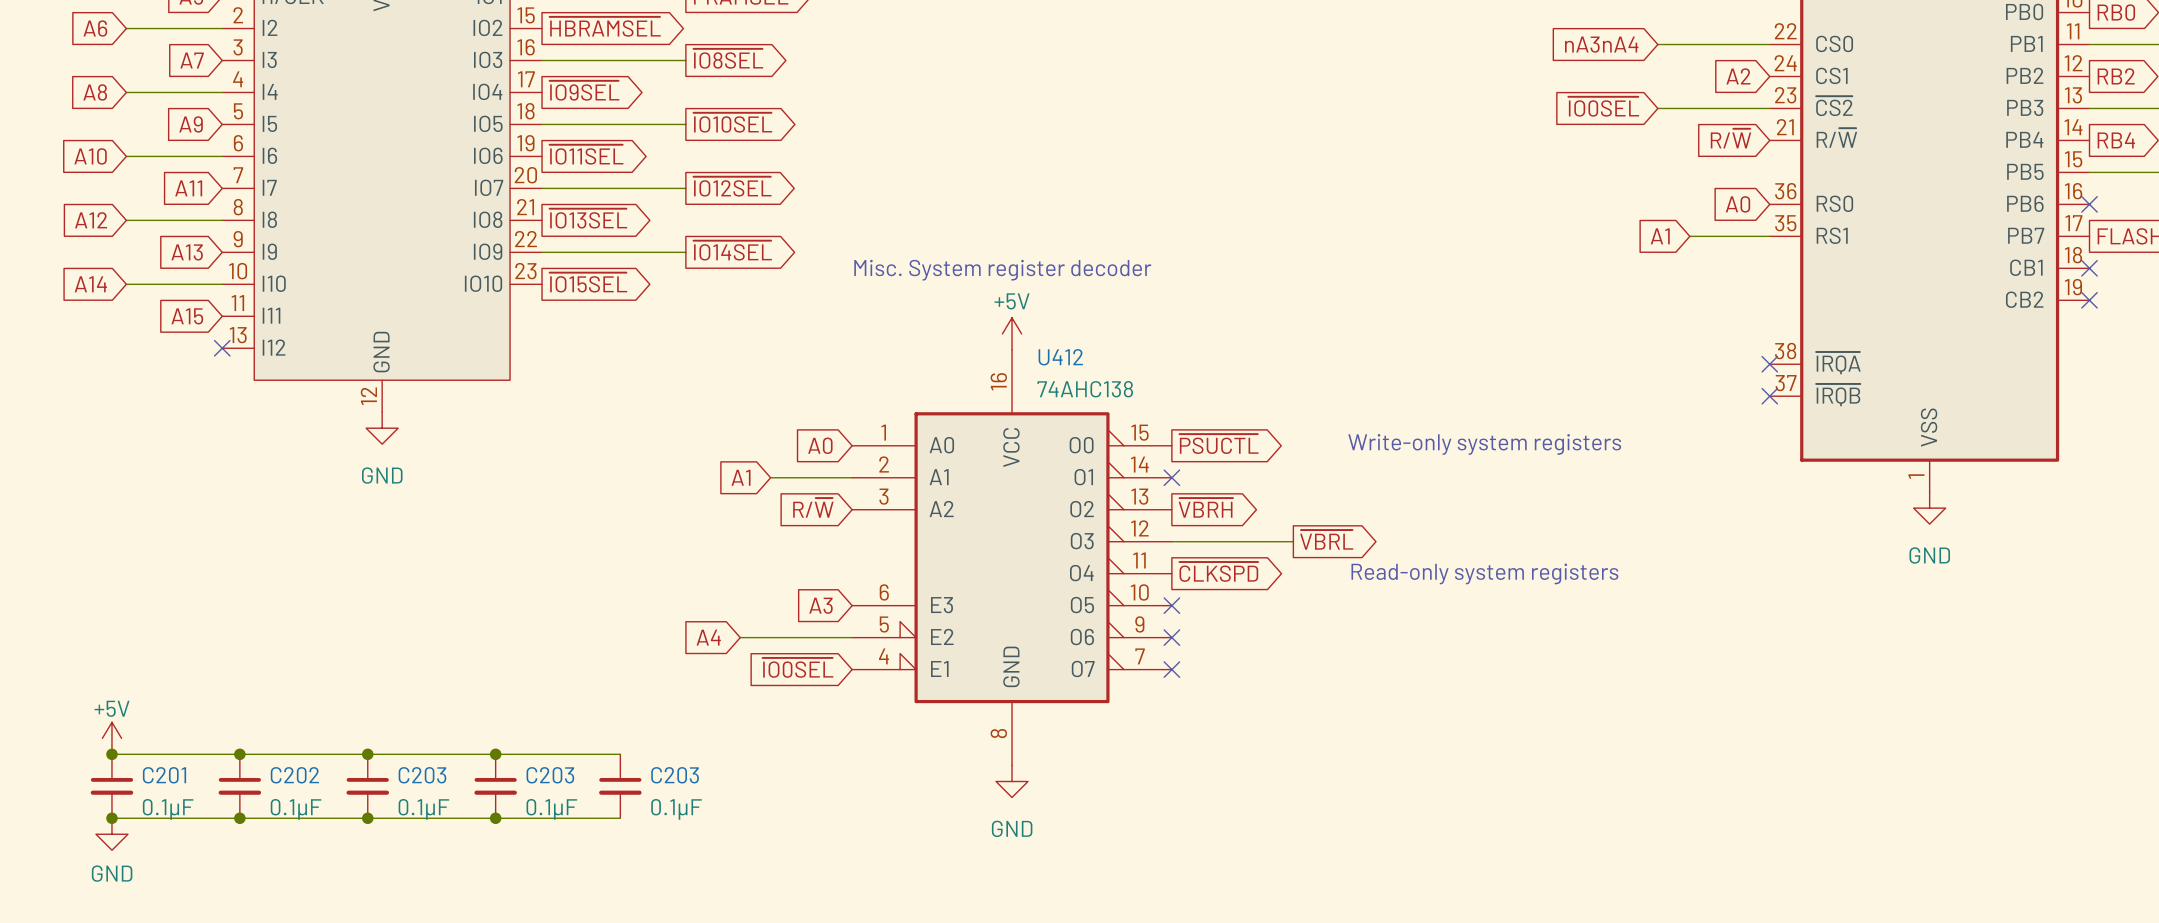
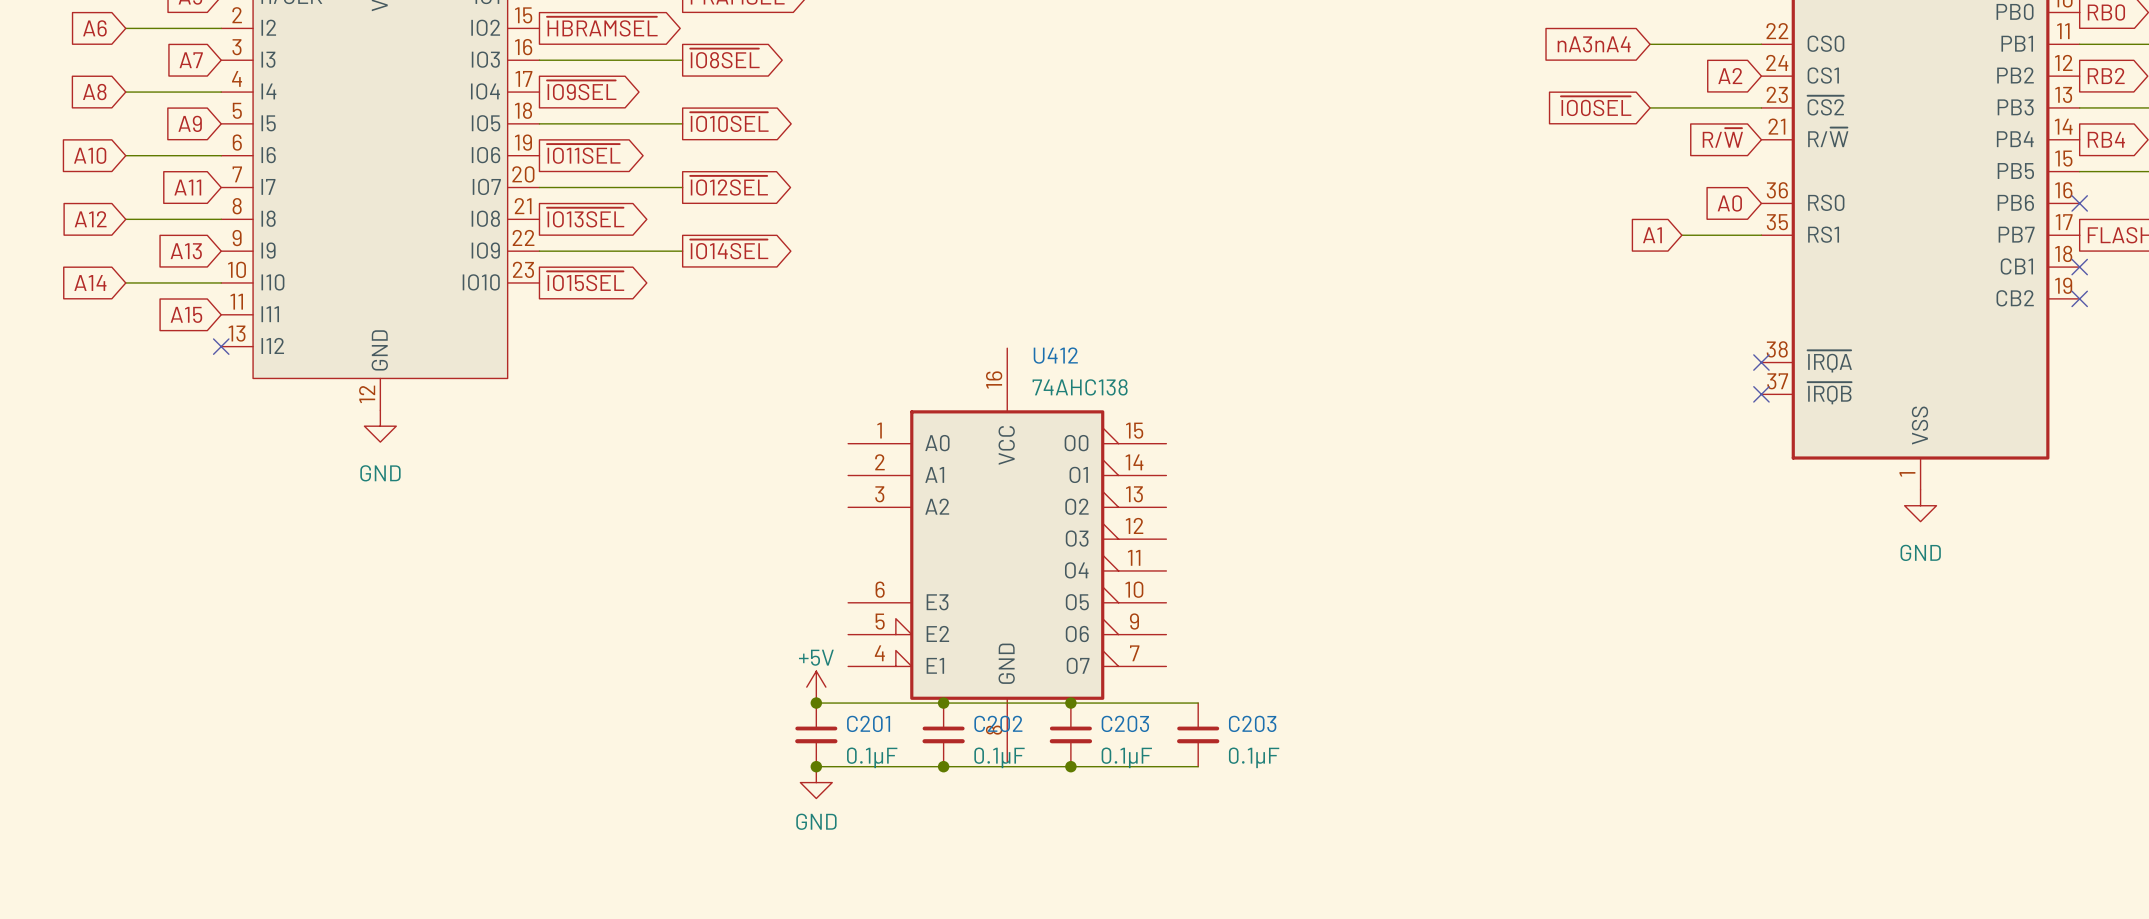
text: Misc. System register decoder (1002, 270) -> none
power symbol: +5V (1012, 333) -> none
global label: ~{PSUCTL} (1219, 444) -> none
text: Write-only system registers (1484, 444) -> none
global label: A0 (820, 445) -> none
global label: A1 (741, 477) -> none
wire: (770, 477) (852, 477) -> none
no-connect mark: (1171, 477) -> none
global label: R/~{W} (813, 507) -> none
global label: ~{VBRH} (1205, 507) -> none
global label: ~{VBRL} (1326, 539) -> none
wire: (1171, 541) (1293, 541) -> none
global label: ~{CLKSPD} (1218, 571) -> none
text: Read-only system registers (1484, 573) -> none
global label: A3 (820, 605) -> none
no-connect mark: (1171, 605) -> none
global label: A4 (708, 637) -> none
wire: (740, 637) (852, 637) -> none
no-connect mark: (1171, 637) -> none
global label: ~{IO0SEL} (797, 667) -> none
no-connect mark: (1171, 669) -> none
power symbol: none -> +5V (816, 687)
wire: none -> (816, 703) (1198, 703)
junction: none -> (816, 703)
junction: none -> (943, 703)
junction: none -> (1070, 703)
power symbol: +5V (111, 738) -> none
C203: none -> 0.1µF (1070, 734)
C203: none -> 0.1µF (1198, 734)
wire: (111, 754) (620, 754) -> none
junction: (111, 754) -> none
junction: (239, 754) -> none
junction: (367, 754) -> none
junction: (495, 754) -> none
wire: none -> (816, 766) (1198, 766)
junction: none -> (816, 766)
junction: none -> (943, 766)
junction: none -> (1070, 766)
power symbol position: GND (1012, 781) -> GND (816, 782)
C201 position: (111, 786) -> (816, 734)
C202 position: (239, 786) -> (943, 734)
C203: 0.1µF (367, 786) -> none
C203: 0.1µF (495, 786) -> none
C203: 0.1µF (620, 786) -> none
wire: (111, 818) (620, 818) -> none
junction: (111, 818) -> none
junction: (239, 818) -> none
junction: (367, 818) -> none
junction: (495, 818) -> none
power symbol text position: GND (1012, 828) -> GND (816, 821)
power symbol: GND (111, 834) -> none

